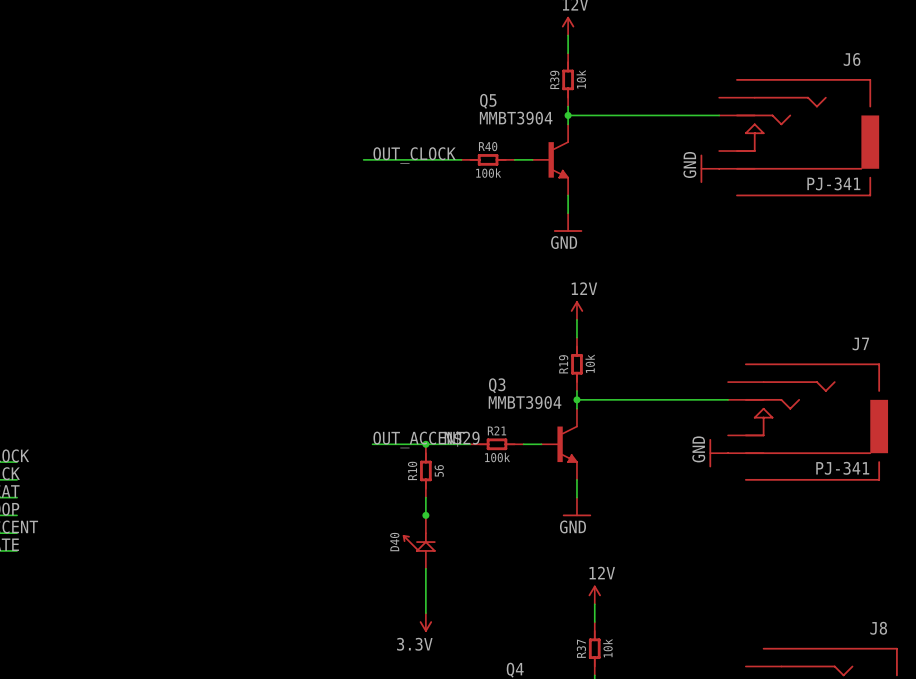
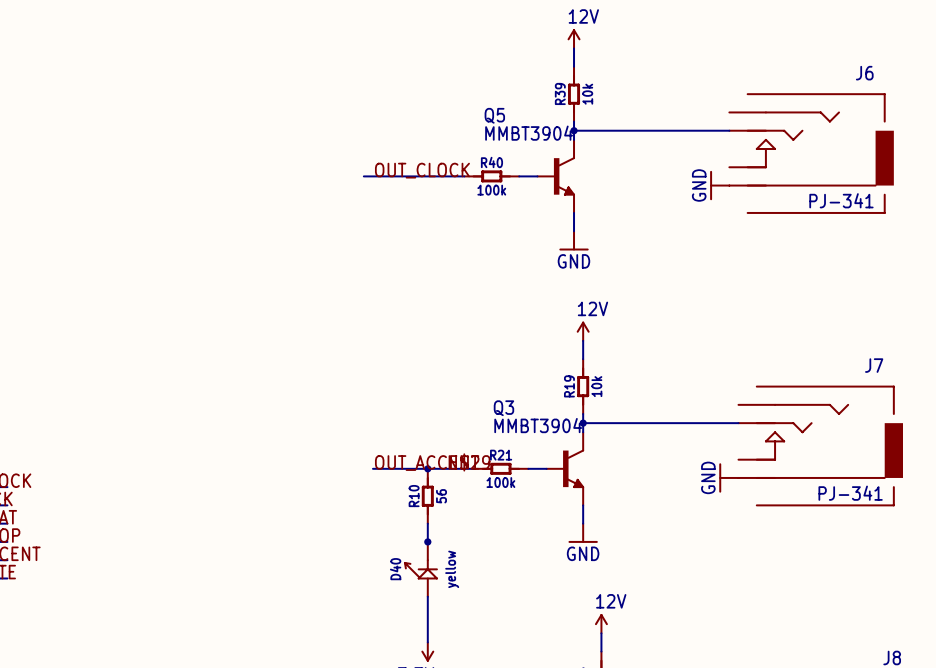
D40 value: none -> yellow (452, 569)

